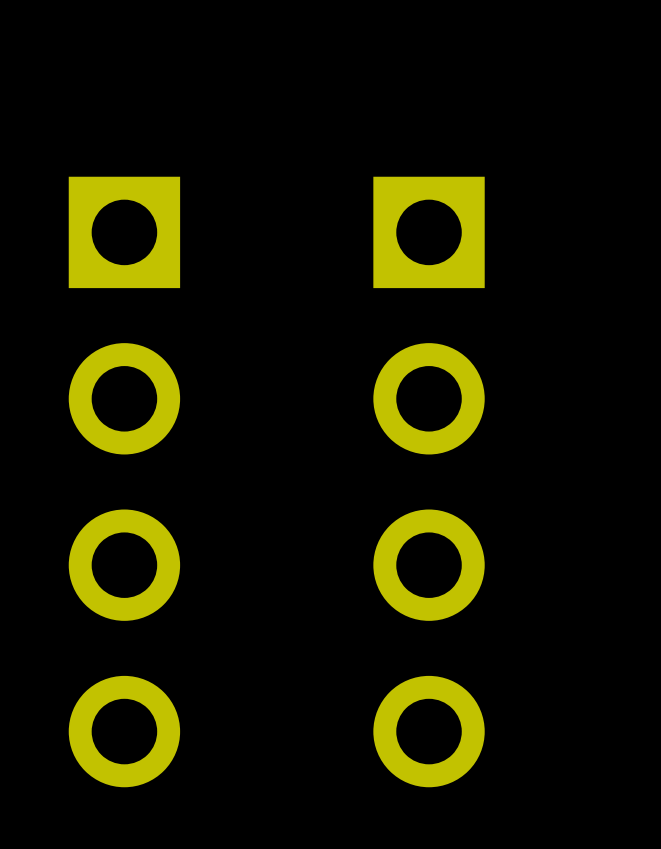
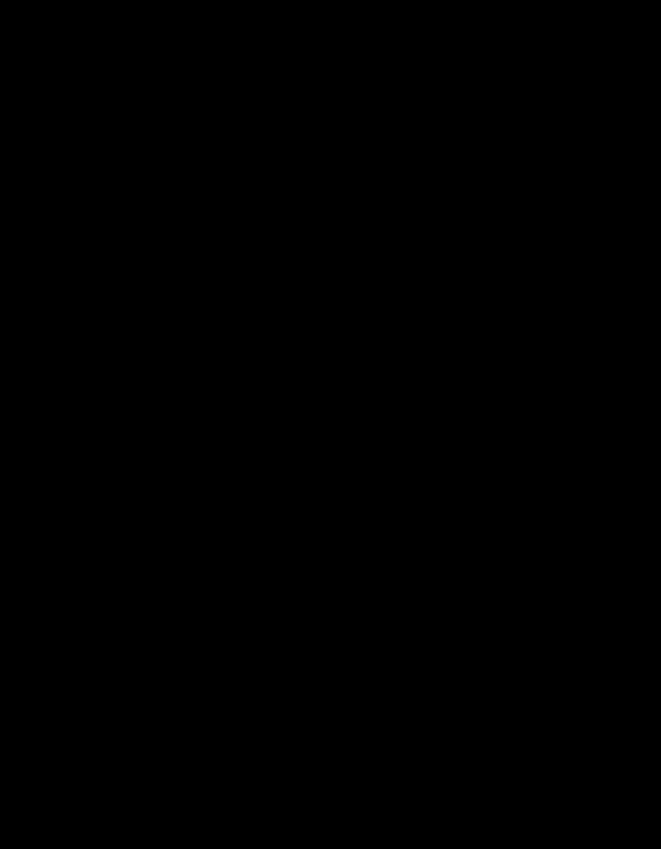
part: (124, 481) -> none
part: (429, 481) -> none

